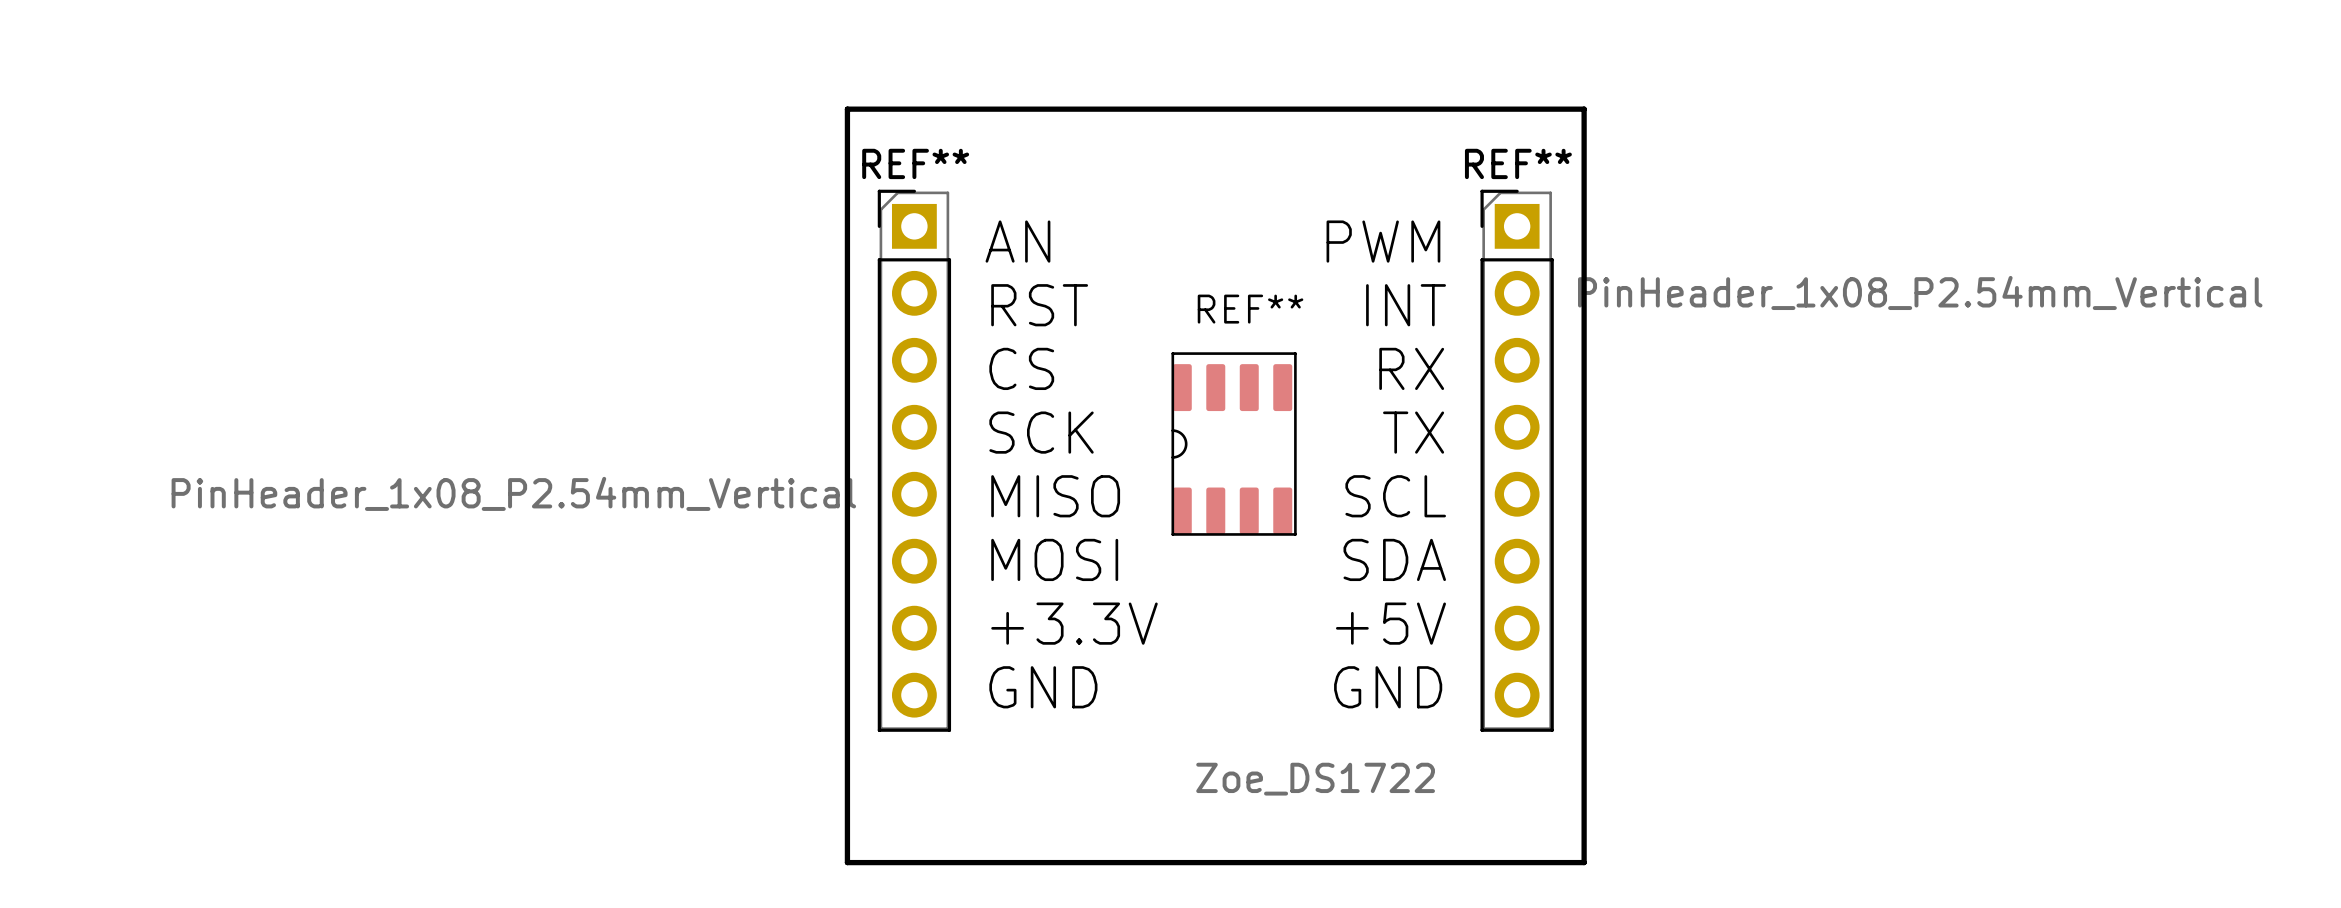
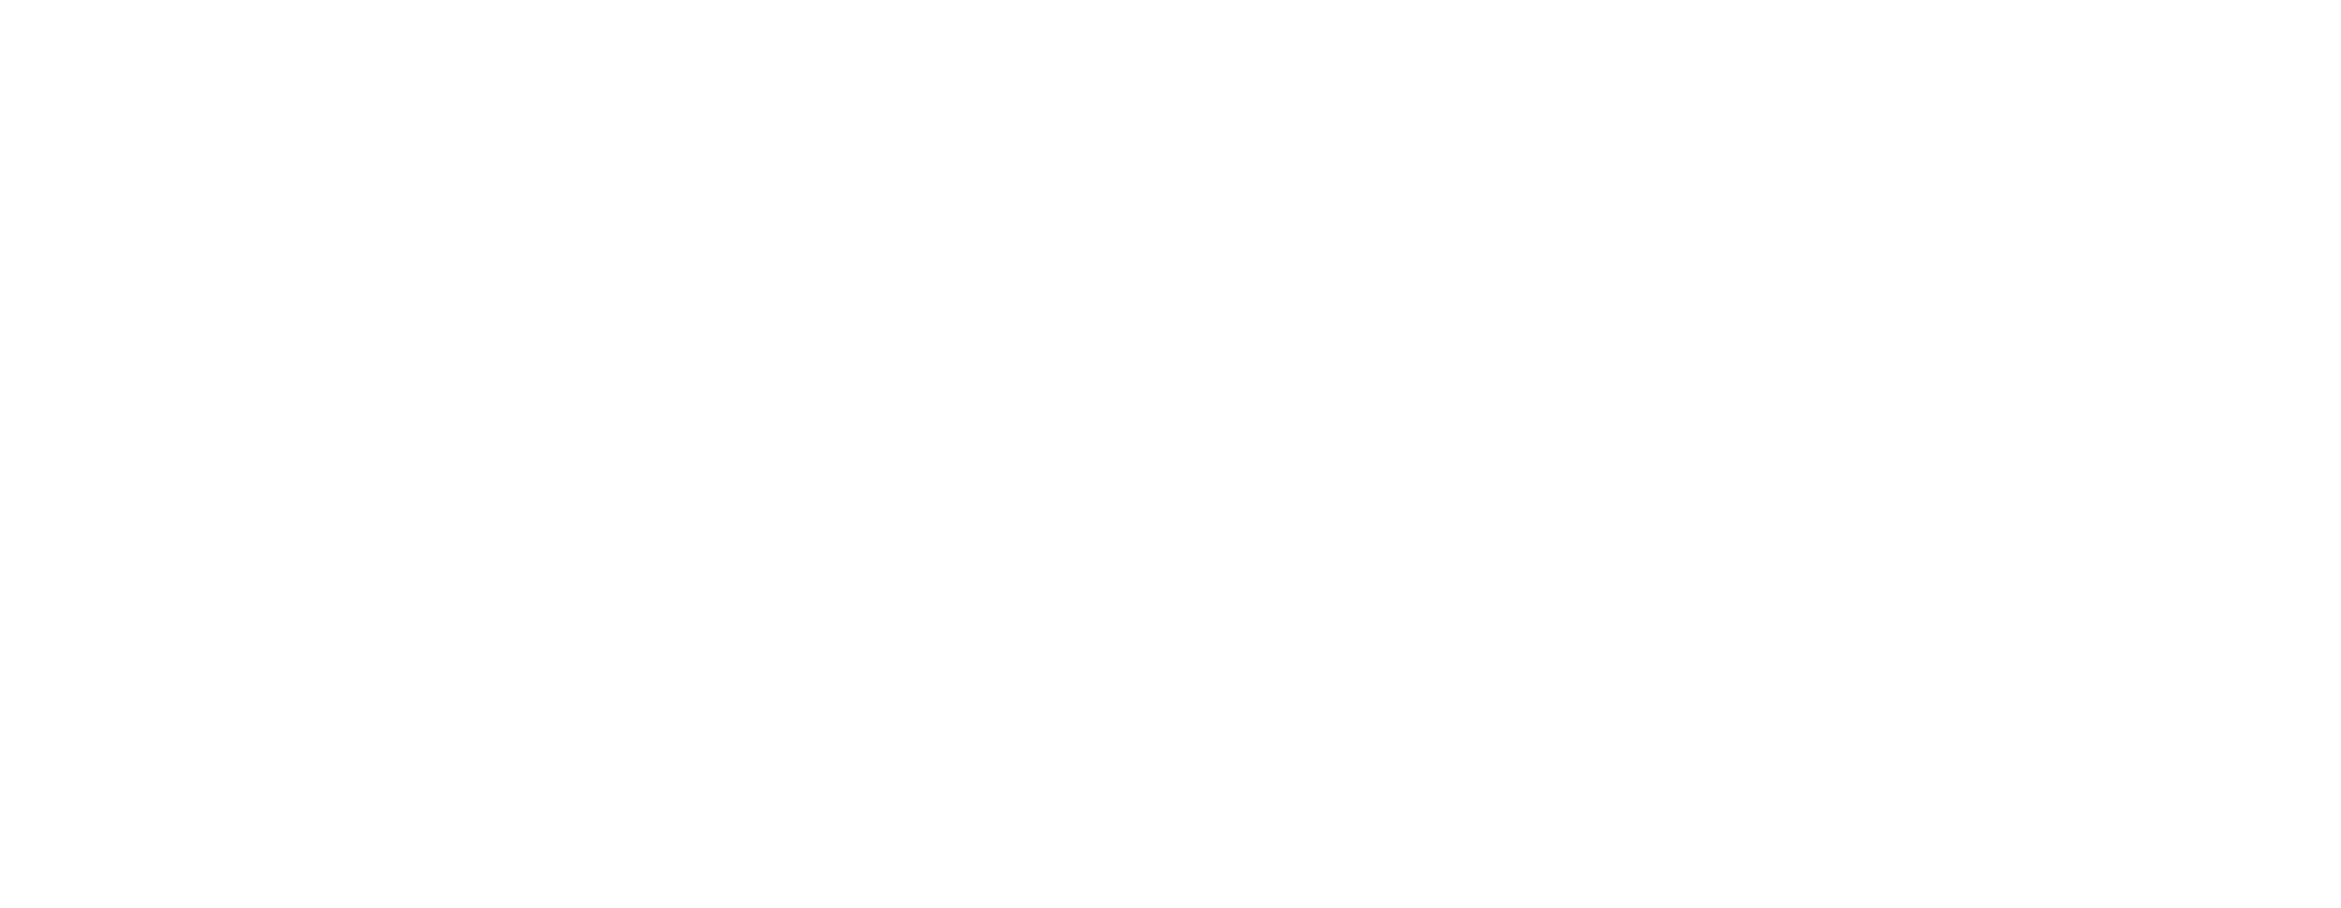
board edge: (847, 109) (1584, 109) (1584, 862) (847, 862) (847, 109) -> none
text: AN (1017, 241) -> none
text: PWM (1383, 241) -> none
text: RST (1039, 305) -> none
text: INT (1406, 305) -> none
text: CS (1021, 368) -> none
text: RX (1411, 368) -> none
text: SCK (1041, 432) -> none
text: TX (1413, 432) -> none
REF**: Zoe_DS1722 (1234, 444) -> none
REF**: PinHeader_1x08_P2.54mm_Vertical (914, 460) -> none
REF**: PinHeader_1x08_P2.54mm_Vertical (1517, 460) -> none
text: MISO (1055, 496) -> none
text: SCL (1395, 496) -> none
text: MOSI (1054, 559) -> none
text: SDA (1394, 559) -> none
text: +3.3V (1074, 623) -> none
text: +5V (1390, 623) -> none
text: GND (1043, 687) -> none
text: GND (1388, 687) -> none

